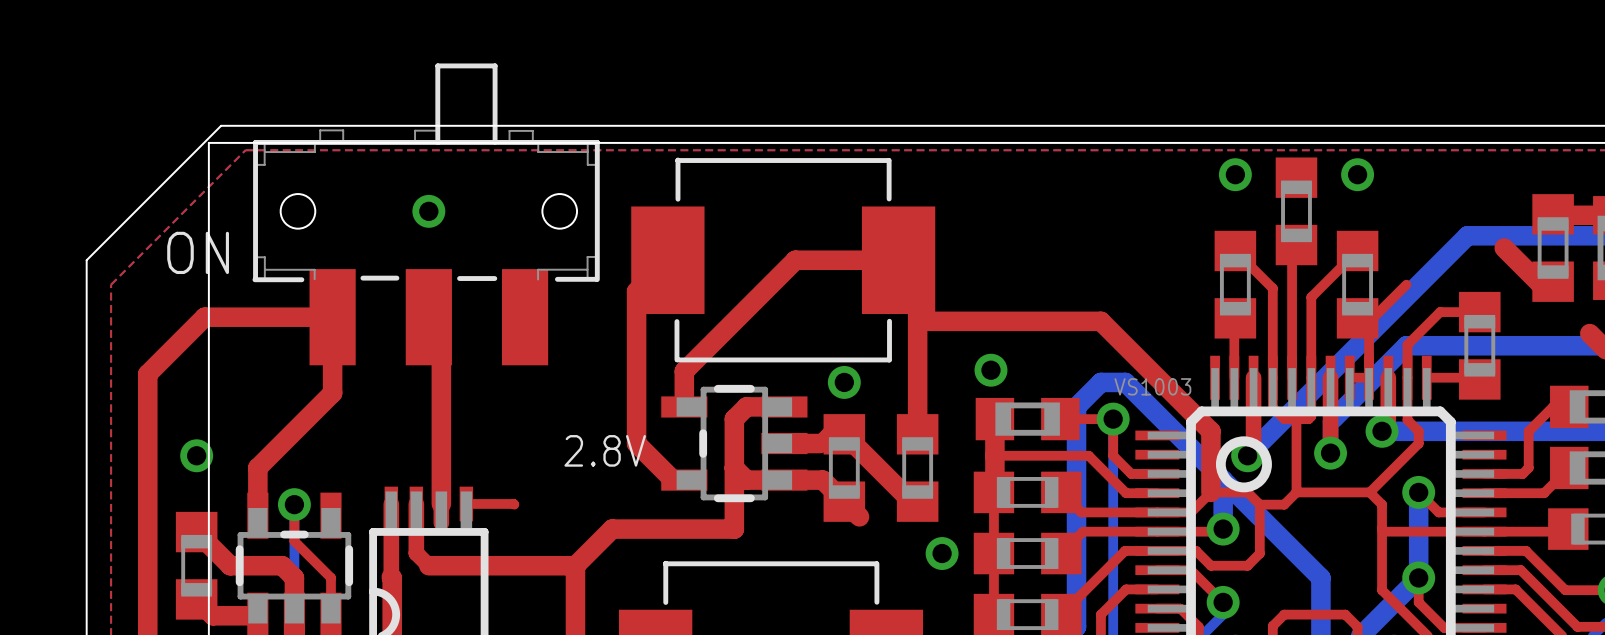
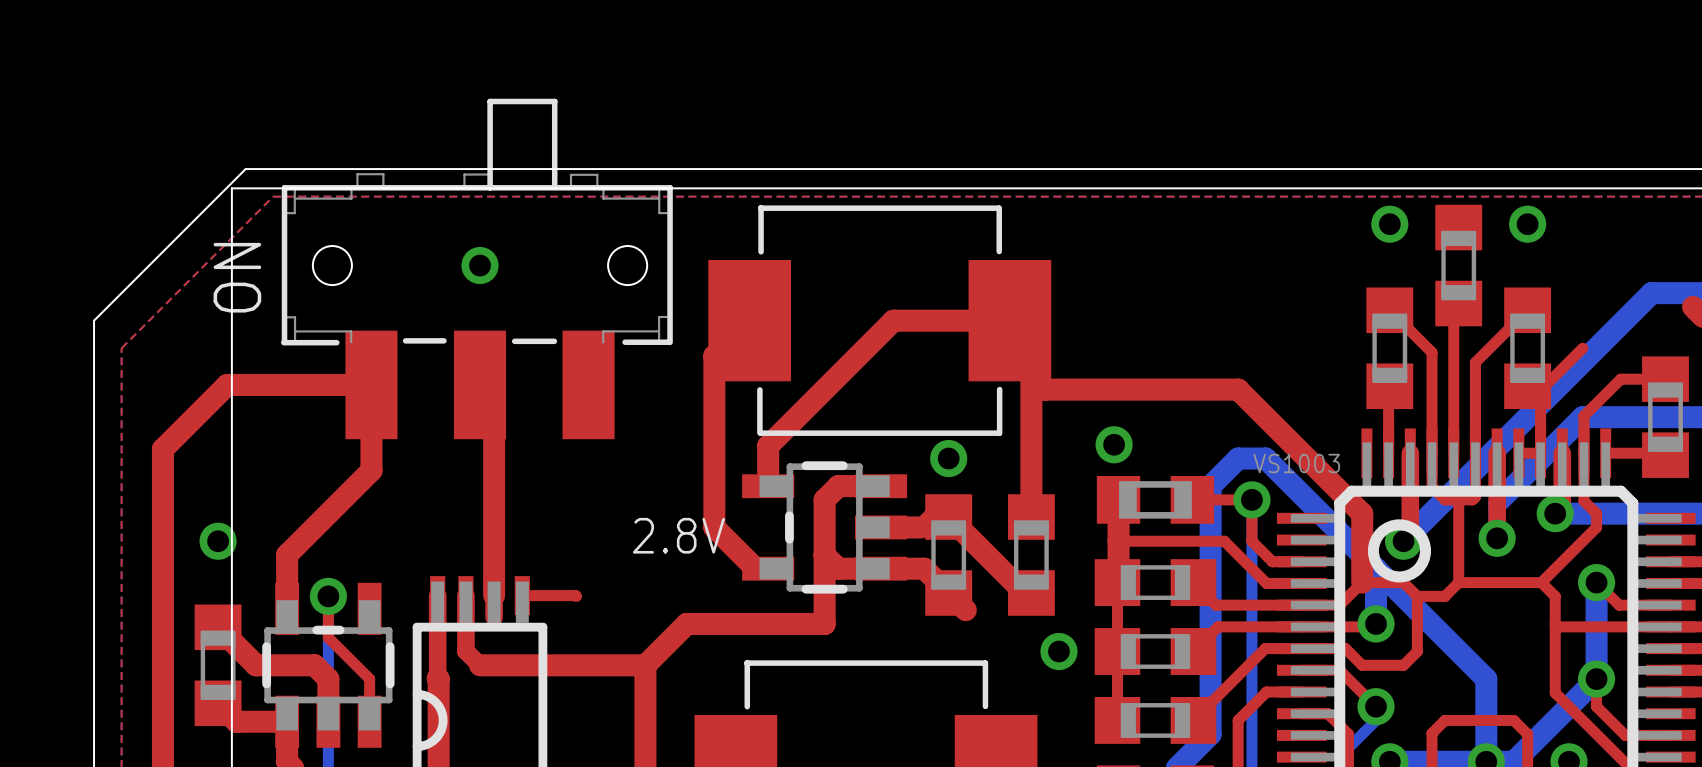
text rotation: 0° (198, 252) -> 90° counterclockwise (237, 277)

